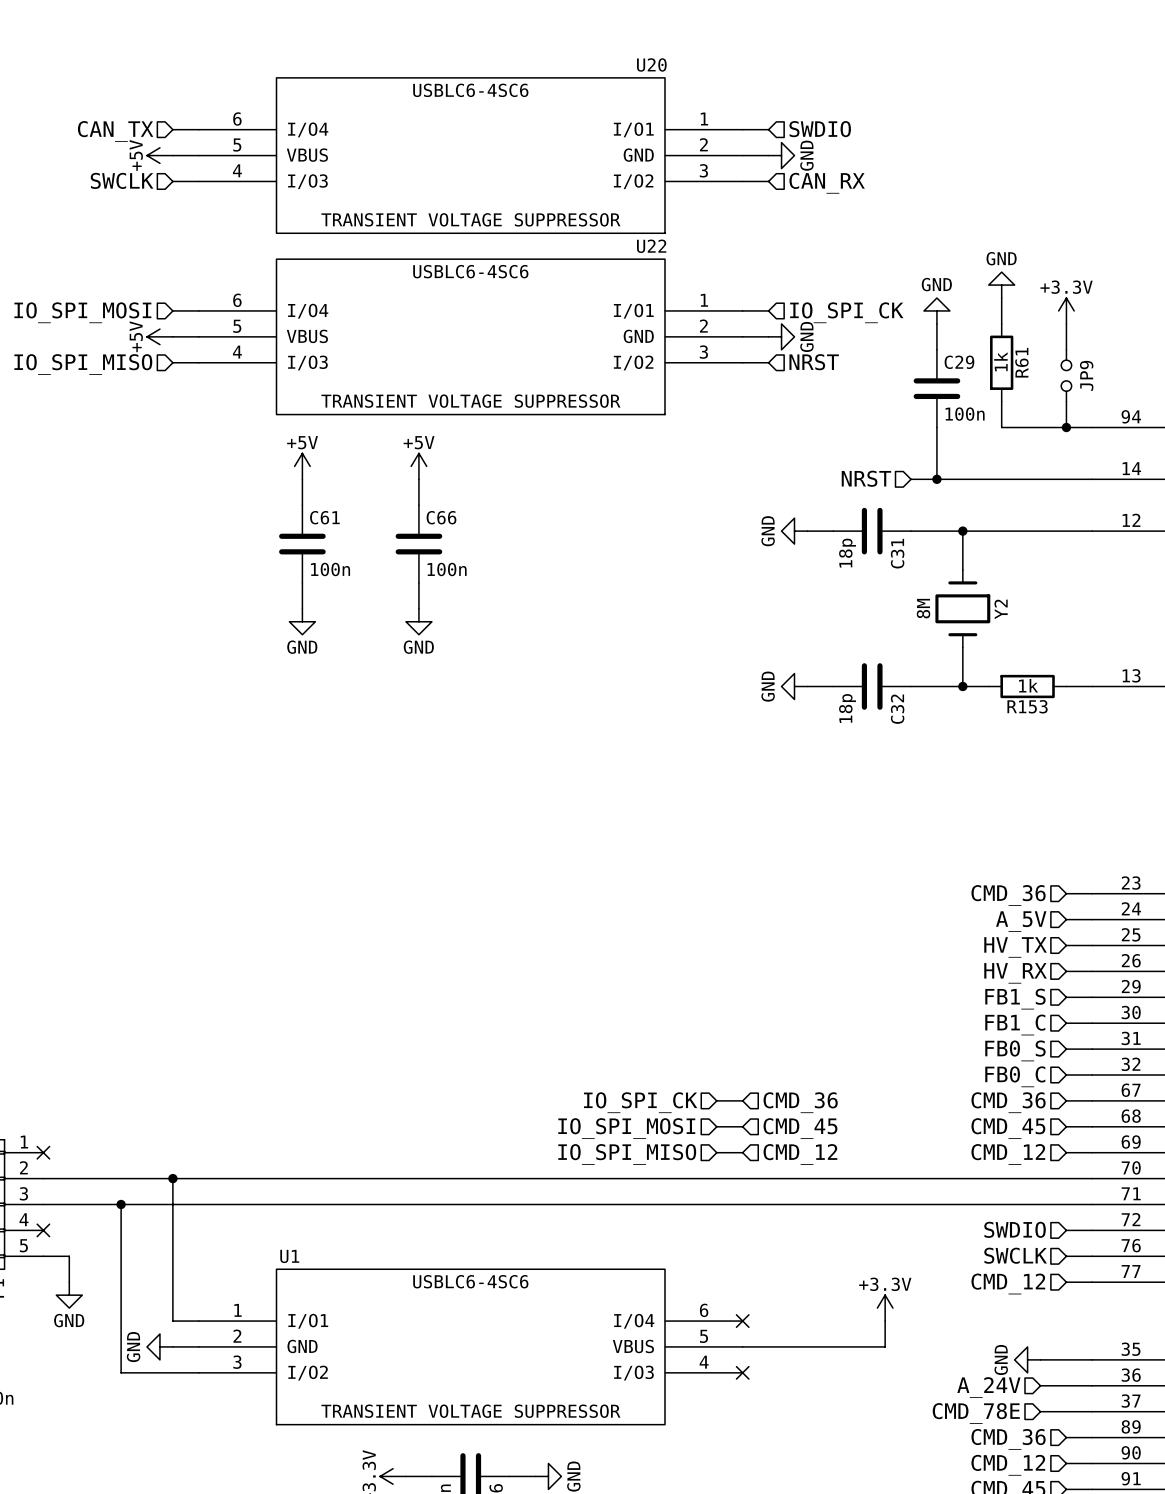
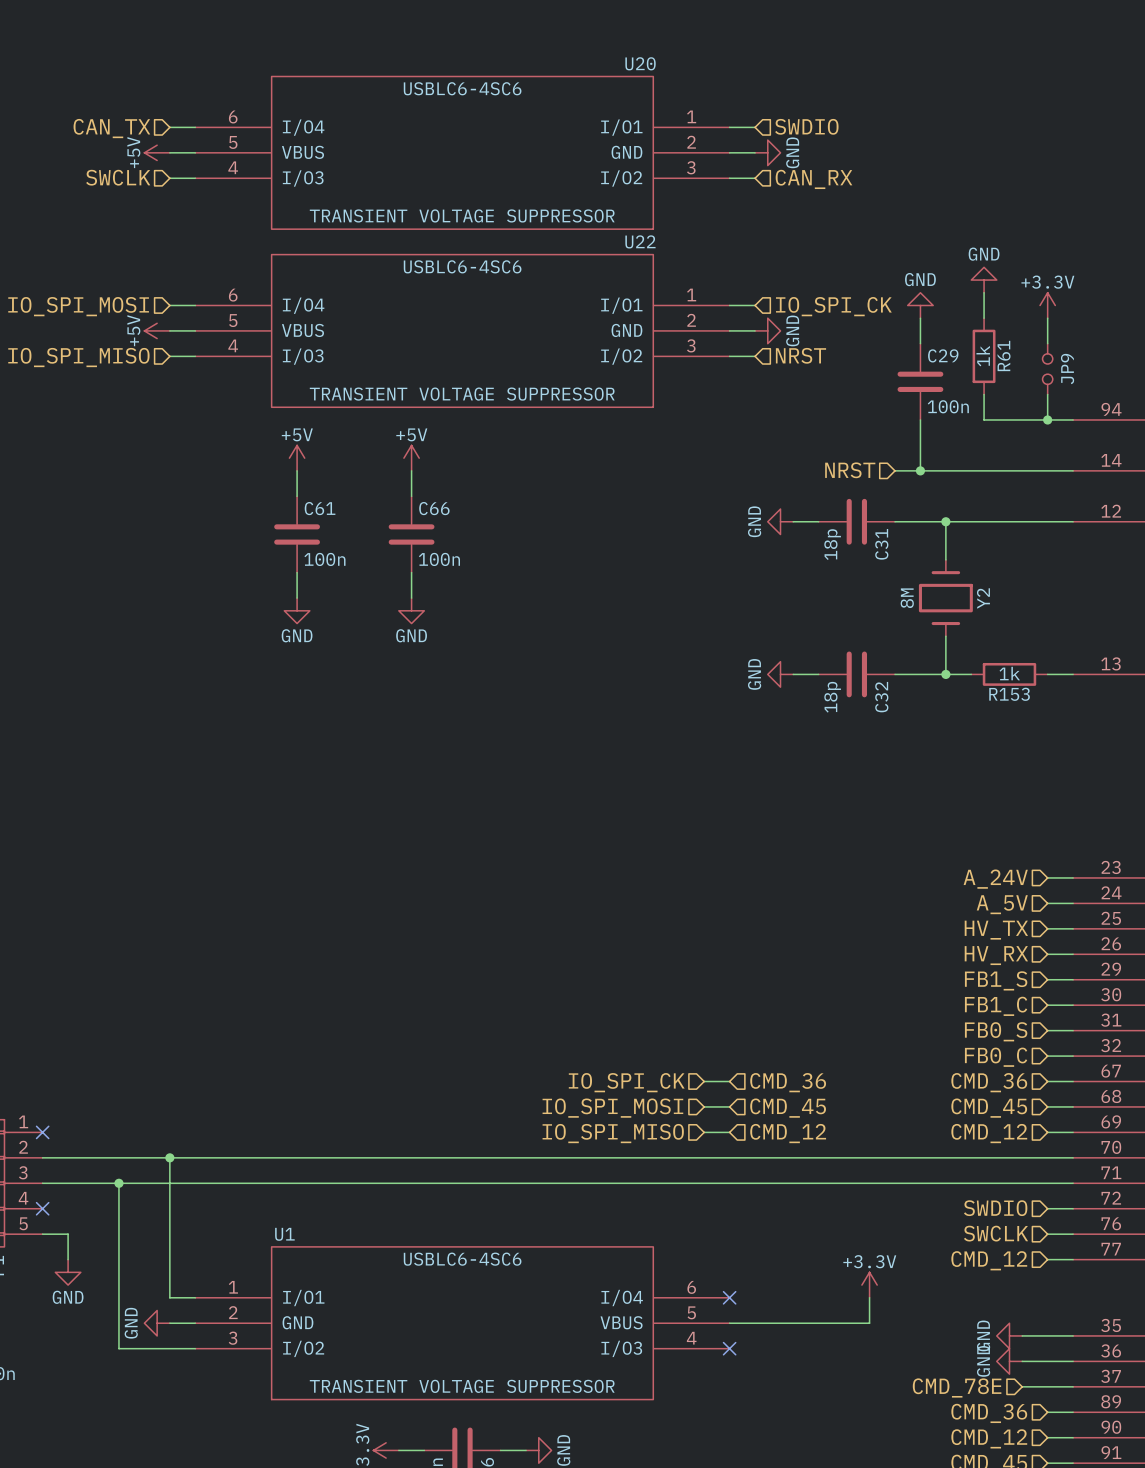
hierarchical label: CMD_36 (1008, 895) -> A_24V (995, 879)
power symbol: none -> GND (1009, 1361)
hierarchical label: A_24V (988, 1387) -> none

